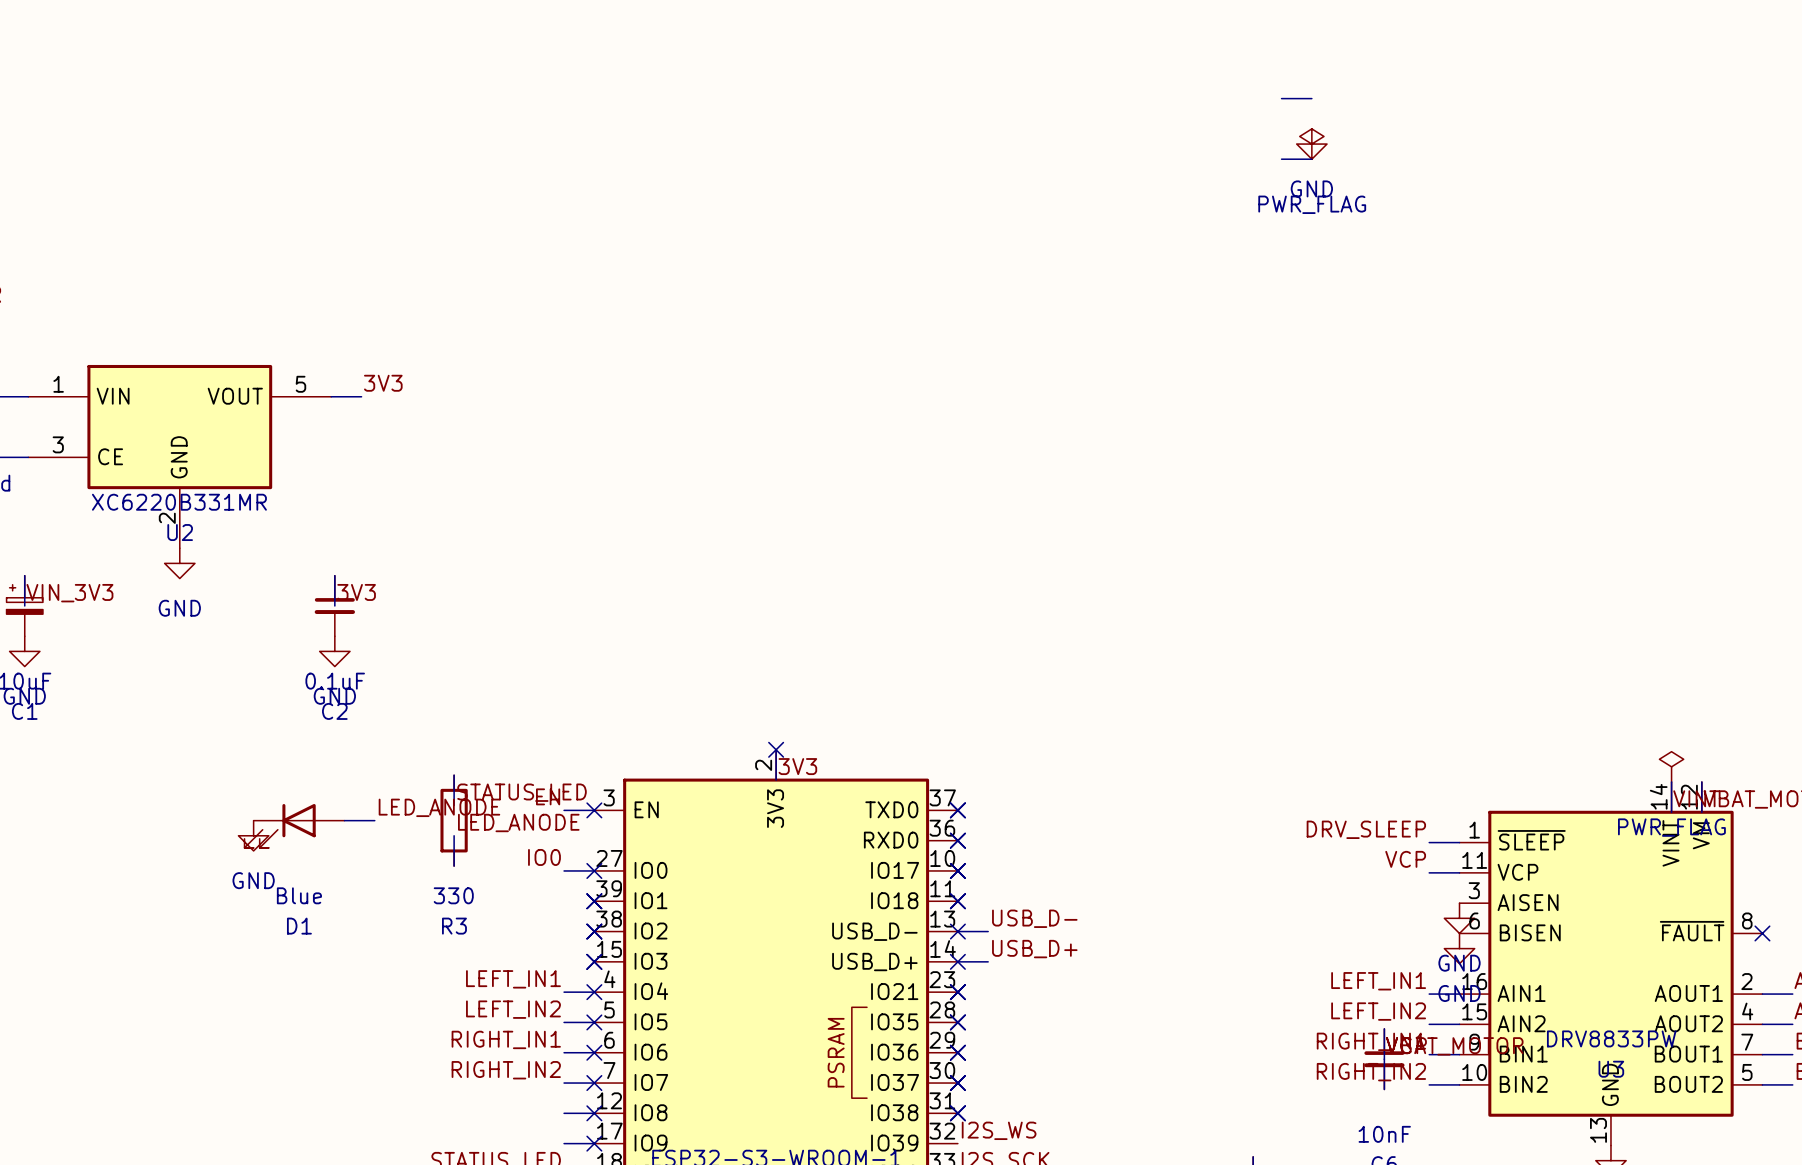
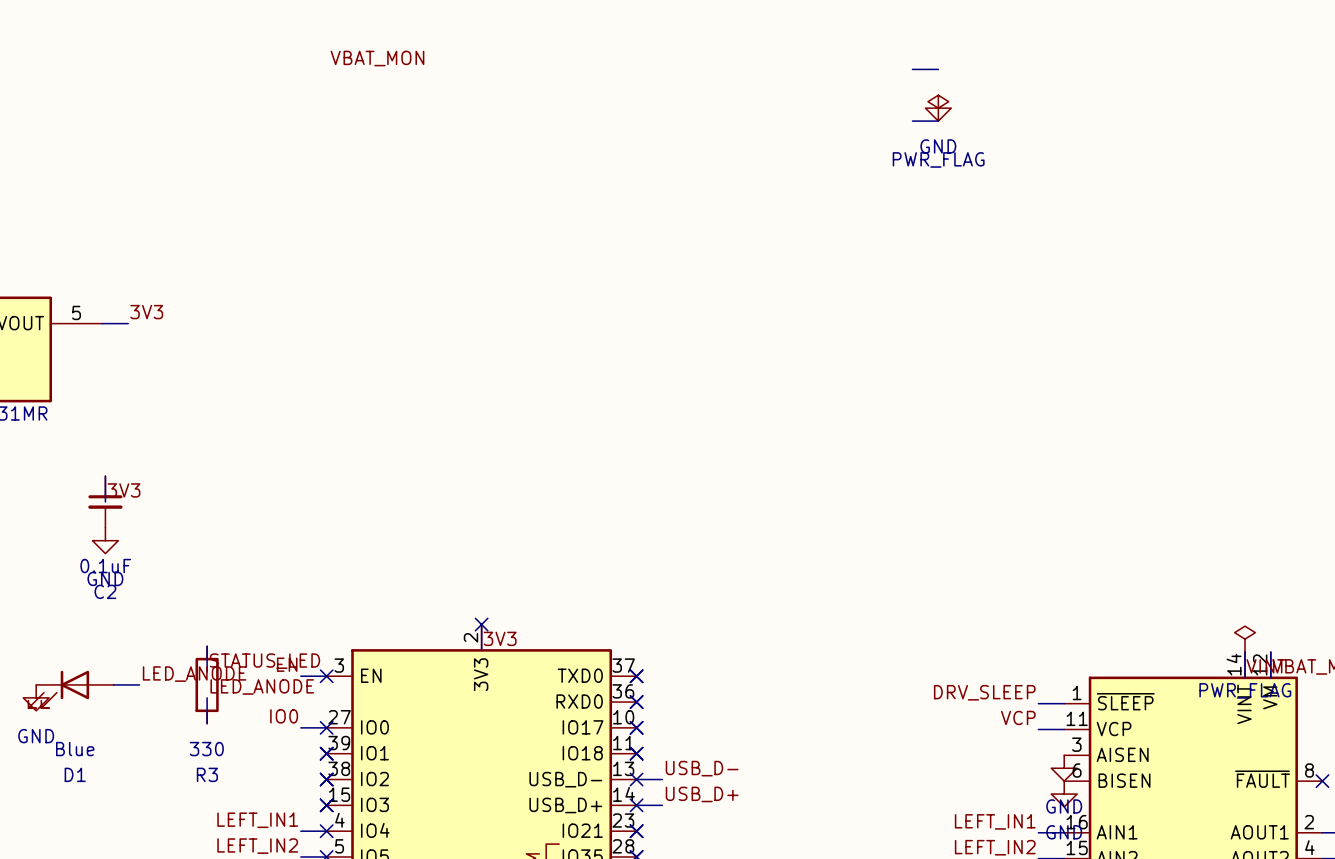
label: none -> VBAT_MON (377, 58)

